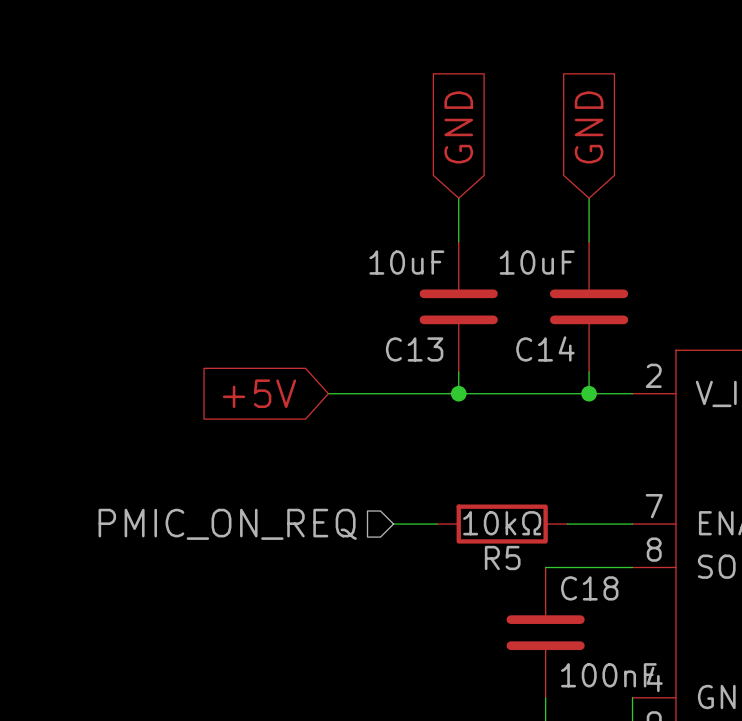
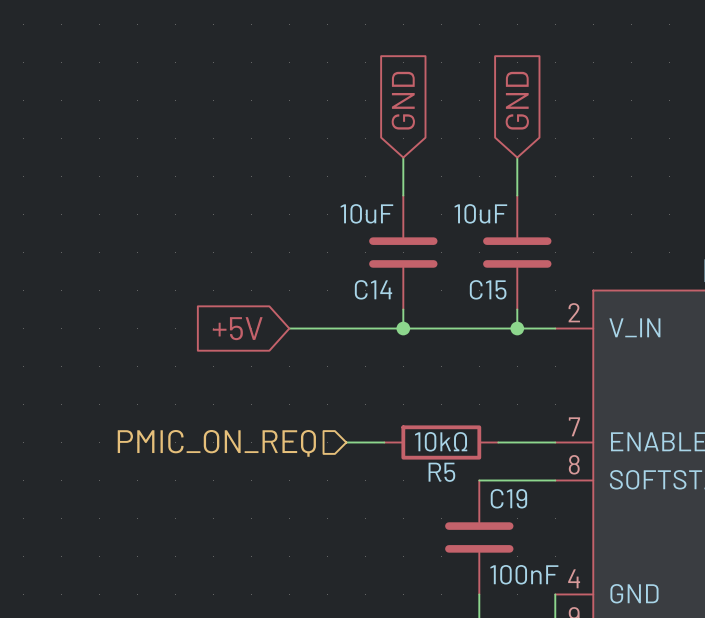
C14 name: C14 (545, 348) -> C15 (488, 289)
C13 name: C13 (414, 349) -> C14 (373, 289)
C18 name: C18 (589, 588) -> C19 (508, 498)

